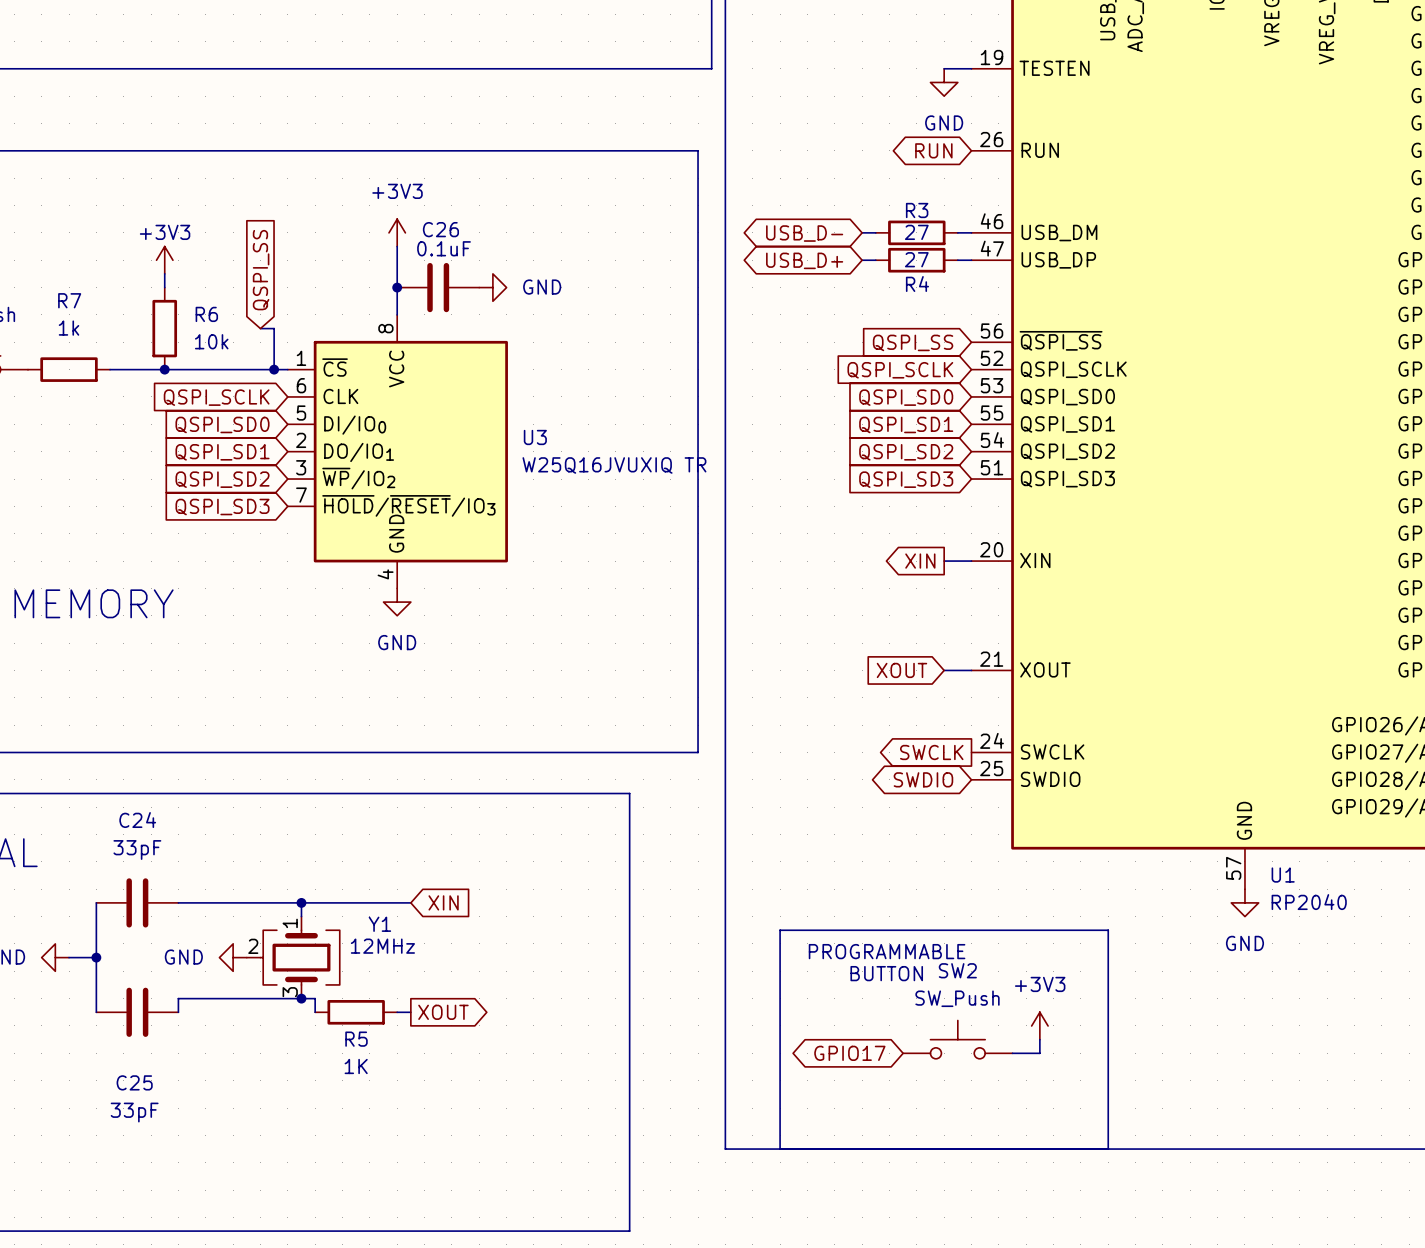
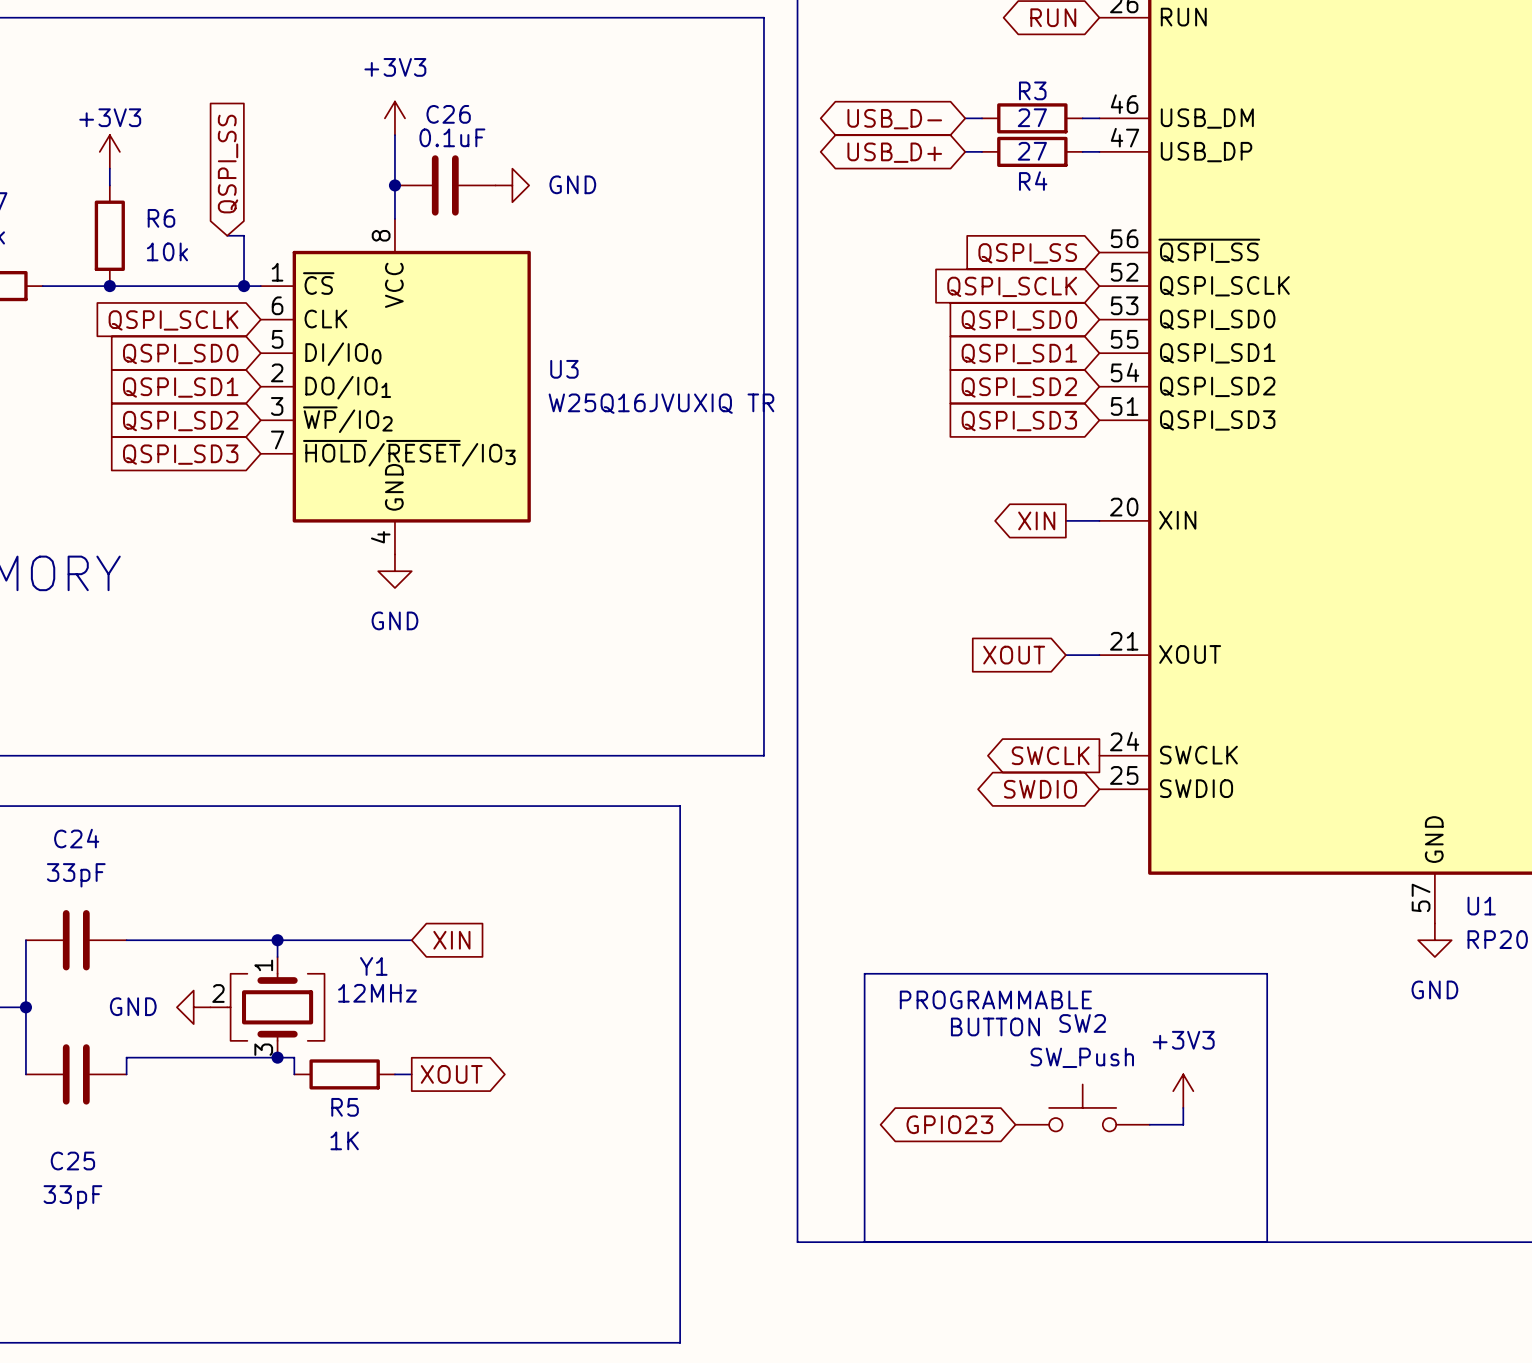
global label: GPIO17 (849, 1053) -> GPIO23 (949, 1124)

